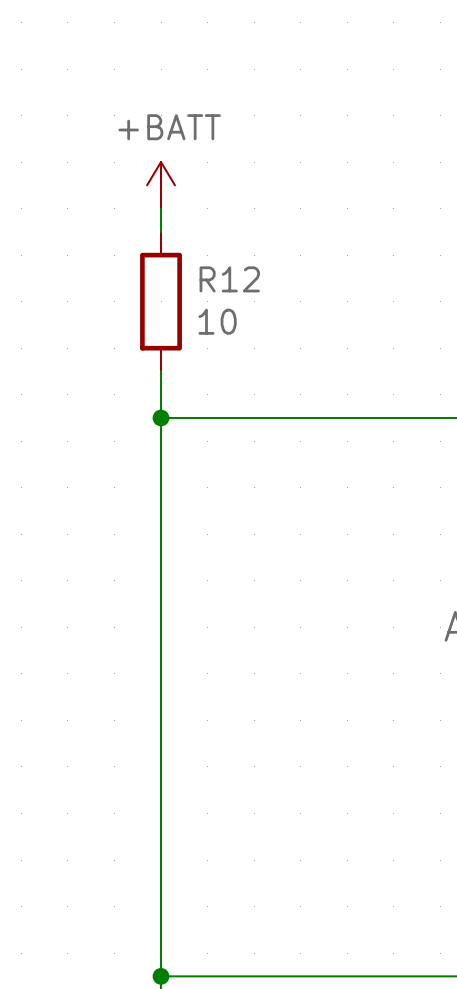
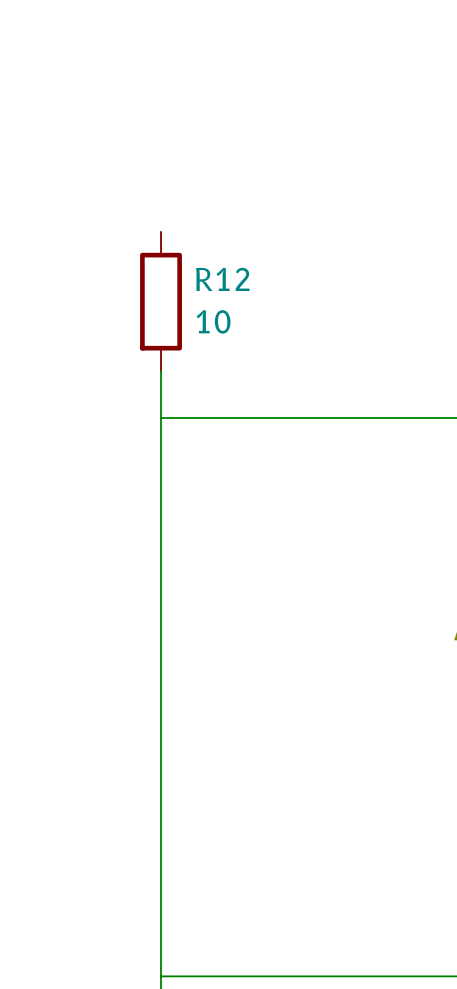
power symbol: +BATT (161, 185) -> none
wire: (161, 208) (161, 231) -> none
junction: (161, 417) -> none
junction: (161, 976) -> none

